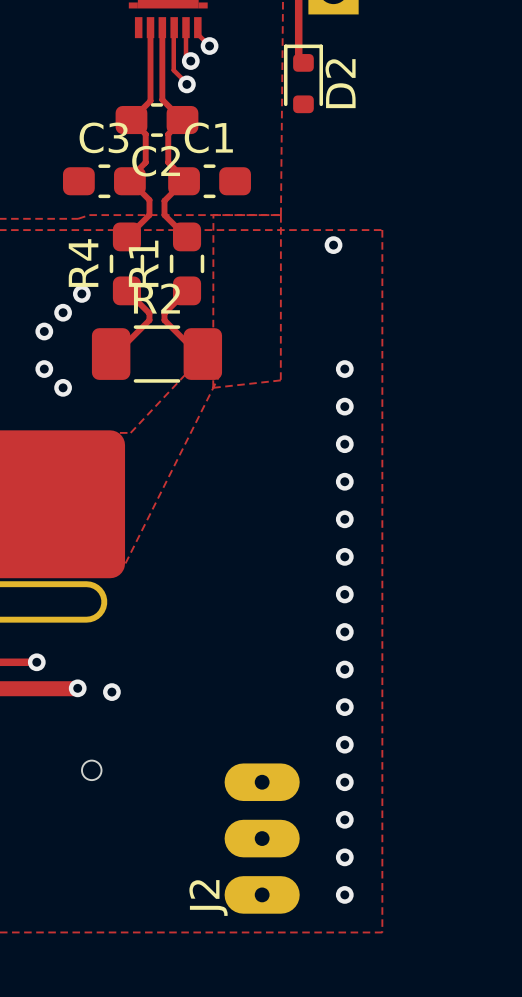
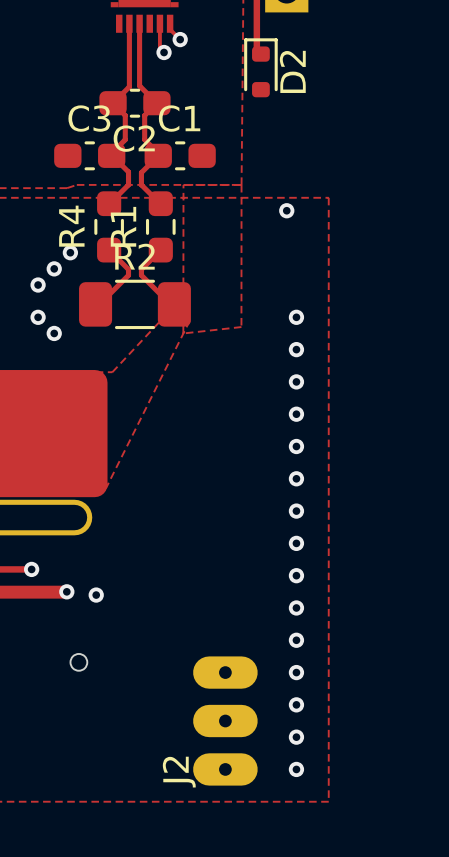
track: (174, 27) (173, 70) (187, 83) -> none
via: (186, 84) -> none

